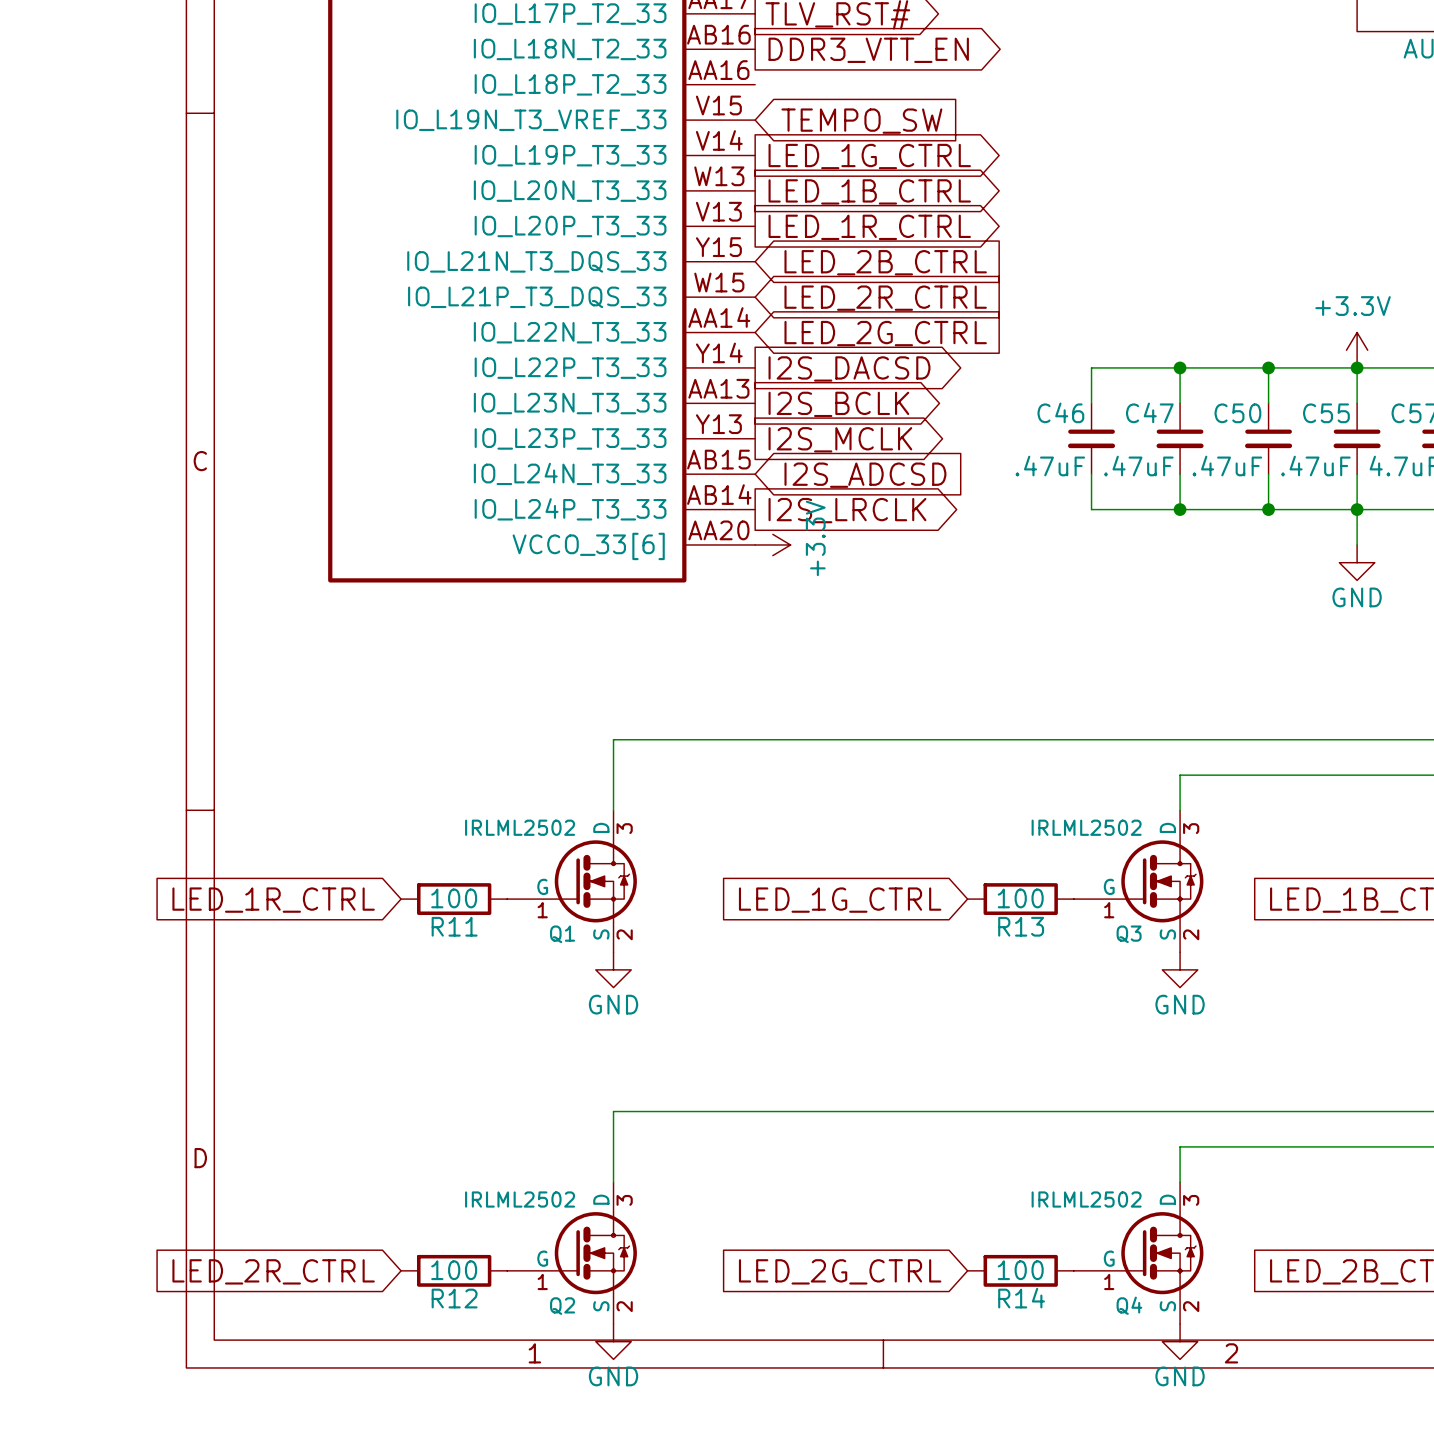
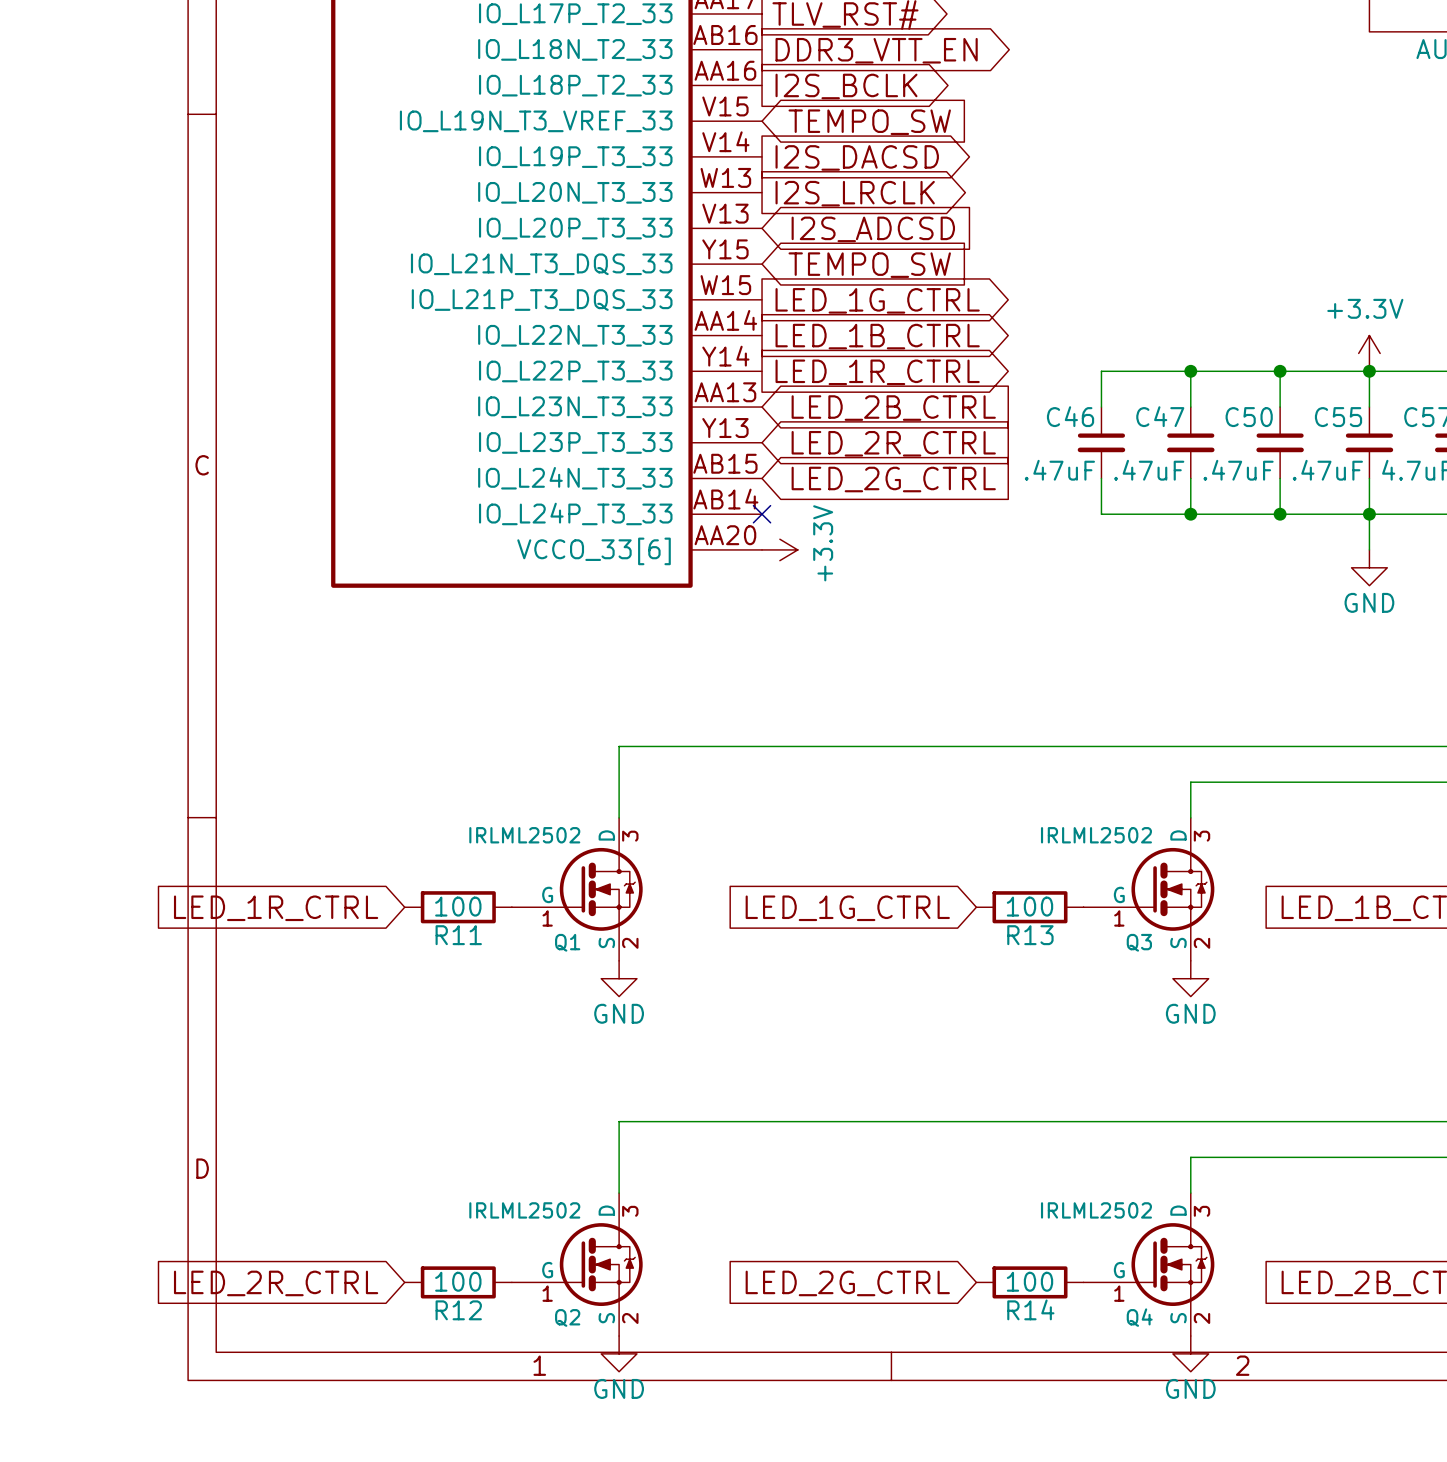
global label: none -> I2S_BCLK (846, 86)
global label: LED_1G_CTRL (869, 156) -> I2S_DACSD (857, 157)
global label: LED_1B_CTRL (869, 191) -> I2S_LRCLK (855, 193)
global label shape: output (869, 227) -> input (873, 229)
global label: LED_1R_CTRL (869, 227) -> I2S_ADCSD (873, 229)
global label: LED_2B_CTRL (885, 262) -> TEMPO_SW (869, 265)
global label shape: input (885, 298) -> output (877, 300)
global label: LED_2R_CTRL (885, 298) -> LED_1G_CTRL (877, 300)
global label shape: input (885, 333) -> output (877, 336)
global label: LED_2G_CTRL (885, 333) -> LED_1B_CTRL (877, 336)
global label: I2S_DACSD (849, 368) -> LED_1R_CTRL (877, 372)
global label shape: output (838, 404) -> input (893, 408)
global label: I2S_BCLK (838, 404) -> LED_2B_CTRL (893, 408)
global label shape: output (840, 439) -> input (893, 443)
global label: I2S_MCLK (840, 439) -> LED_2R_CTRL (893, 443)
global label: I2S_ADCSD (865, 475) -> LED_2G_CTRL (893, 479)
no-connect mark: none -> (762, 514)
global label: I2S_LRCLK (847, 510) -> none

